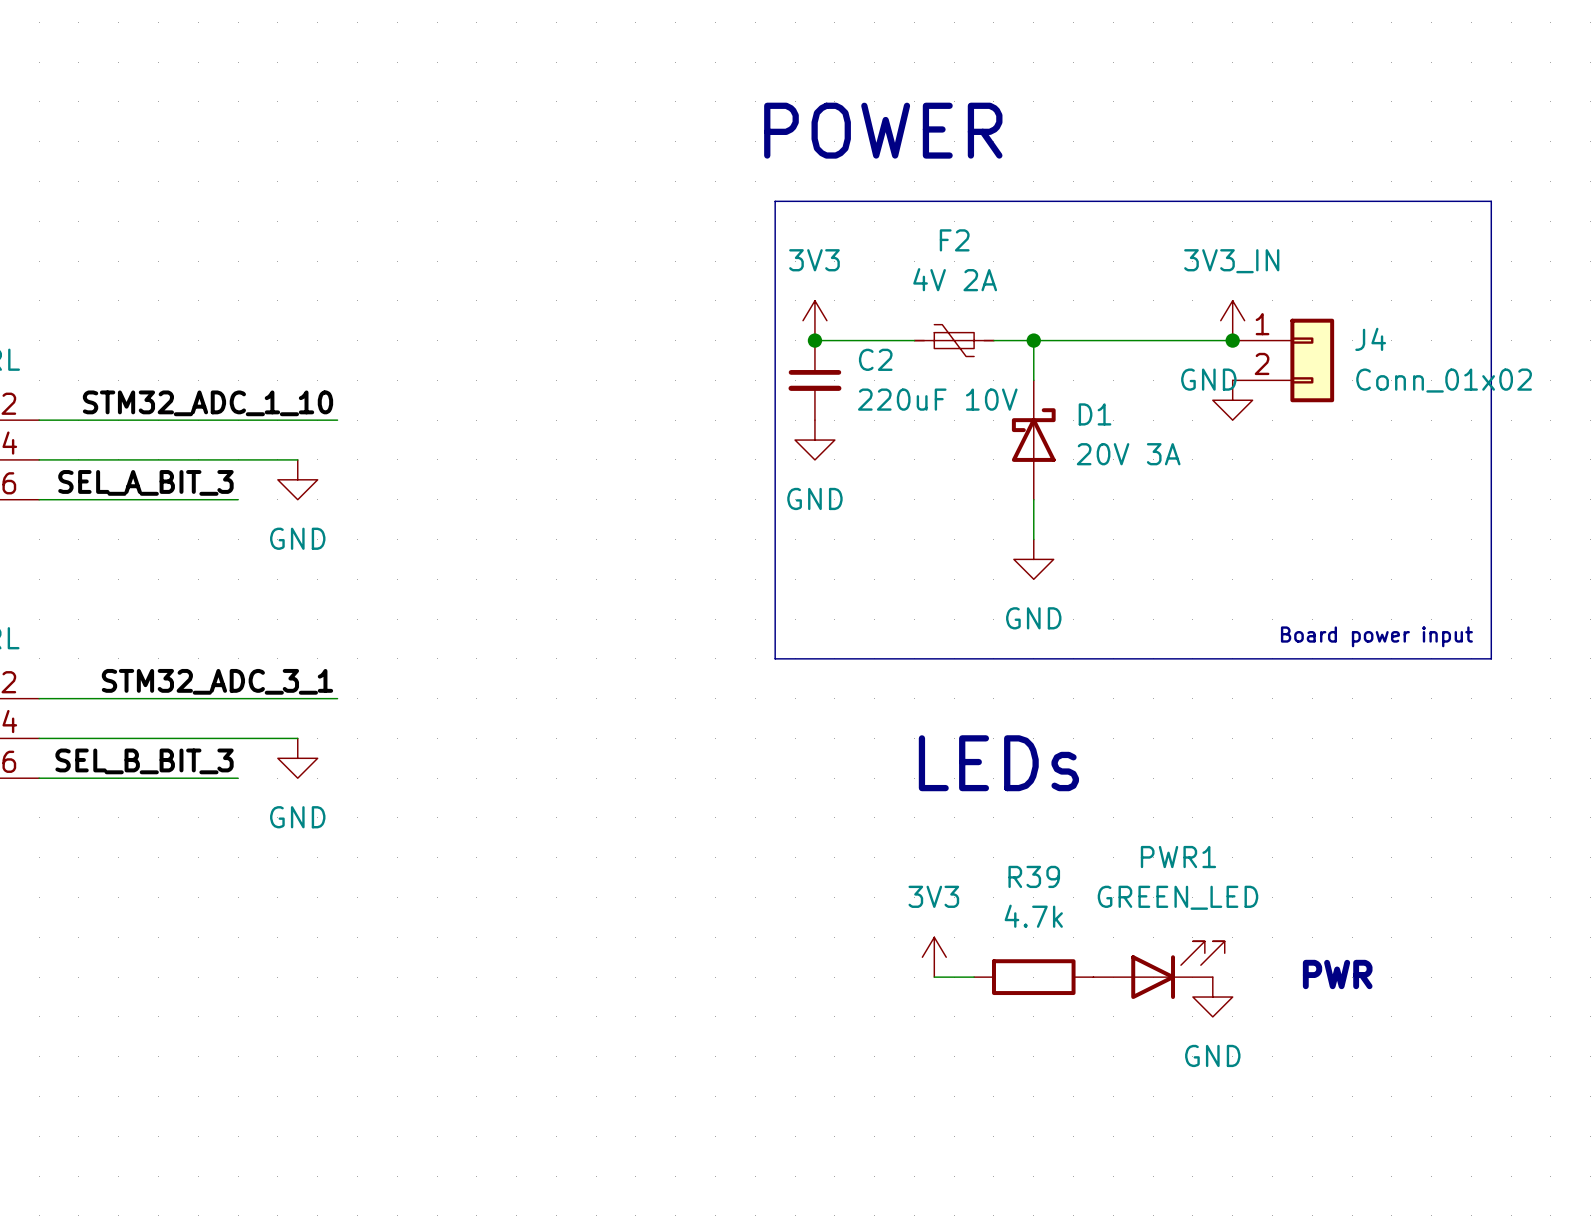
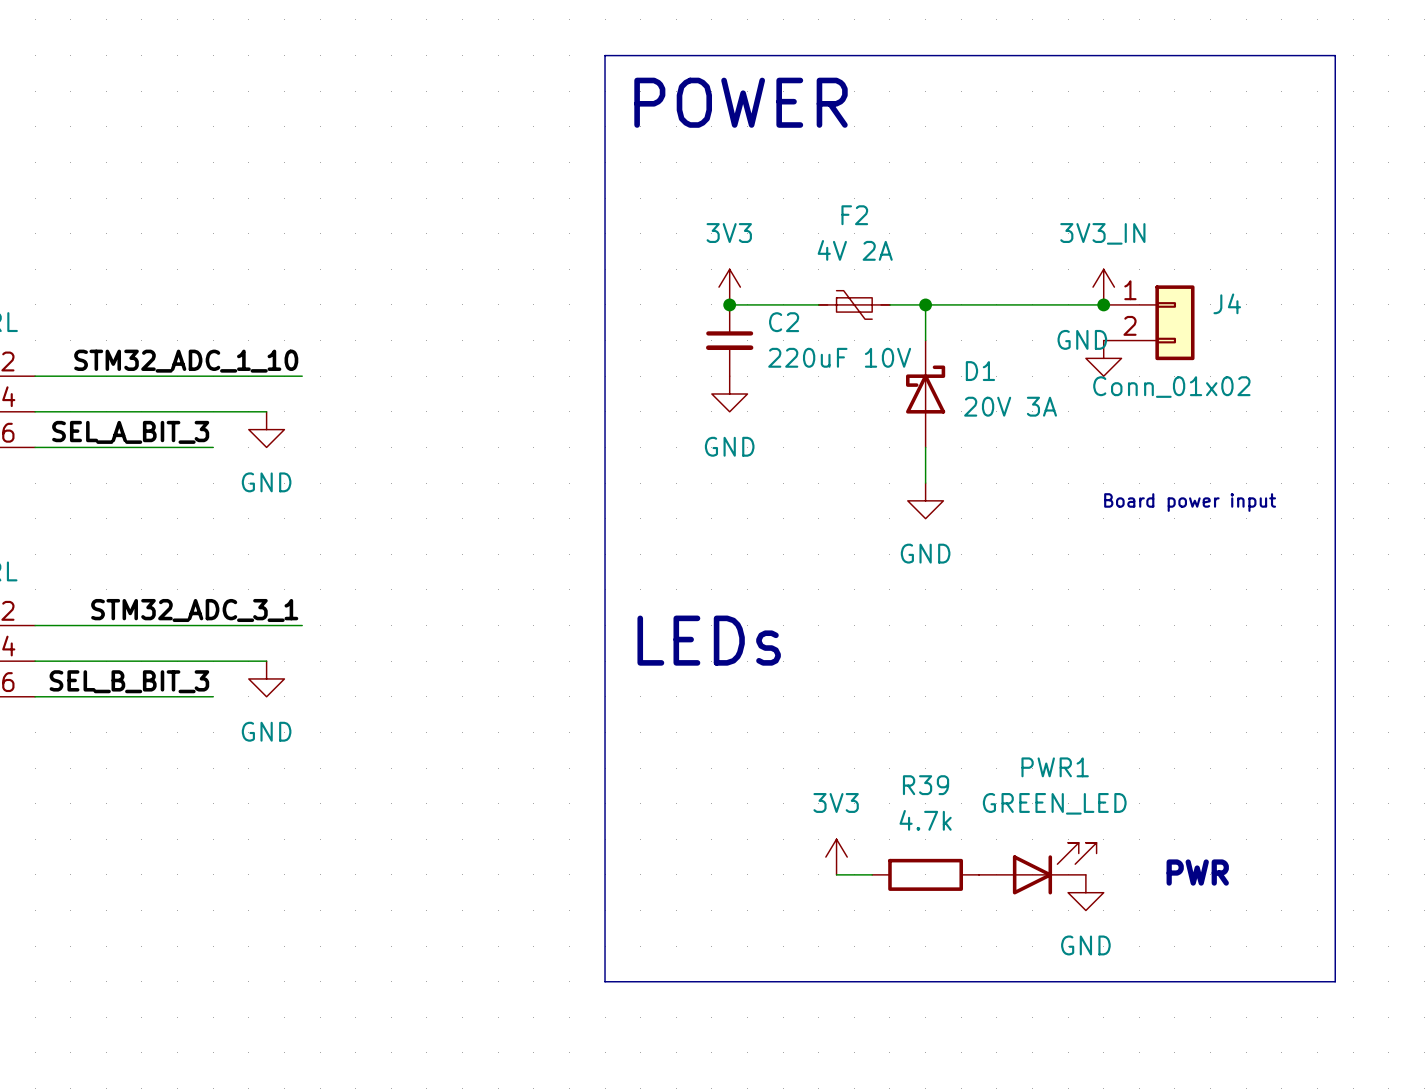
text position: POWER (883, 130) -> POWER (741, 102)
line: (1491, 201) (775, 201) (775, 658) (1491, 658) -> (1335, 180) (1335, 55) (605, 55) (605, 981) (1335, 981) (1335, 589)
J4 value position: Conn_01x02 (1444, 380) -> Conn_01x02 (1171, 387)
text position: Board power input (1376, 636) -> Board power input (1190, 502)
text position: LEDs (998, 763) -> LEDs (709, 640)

